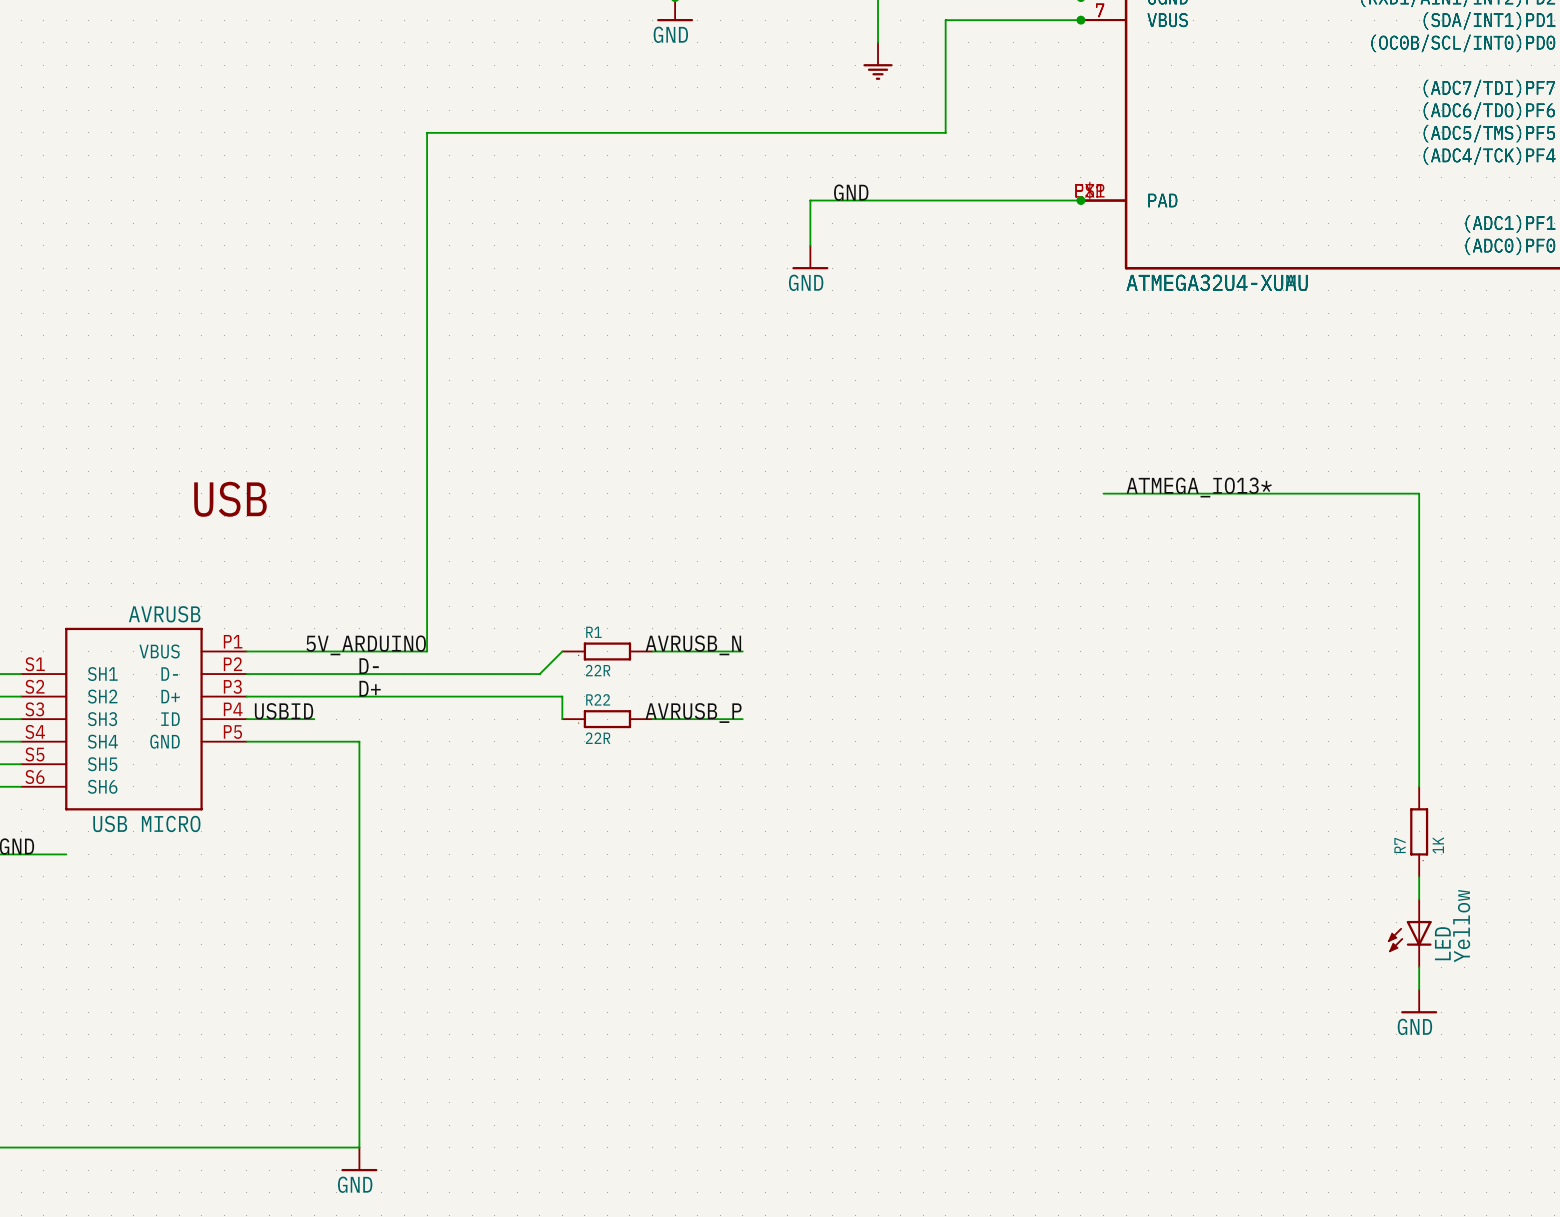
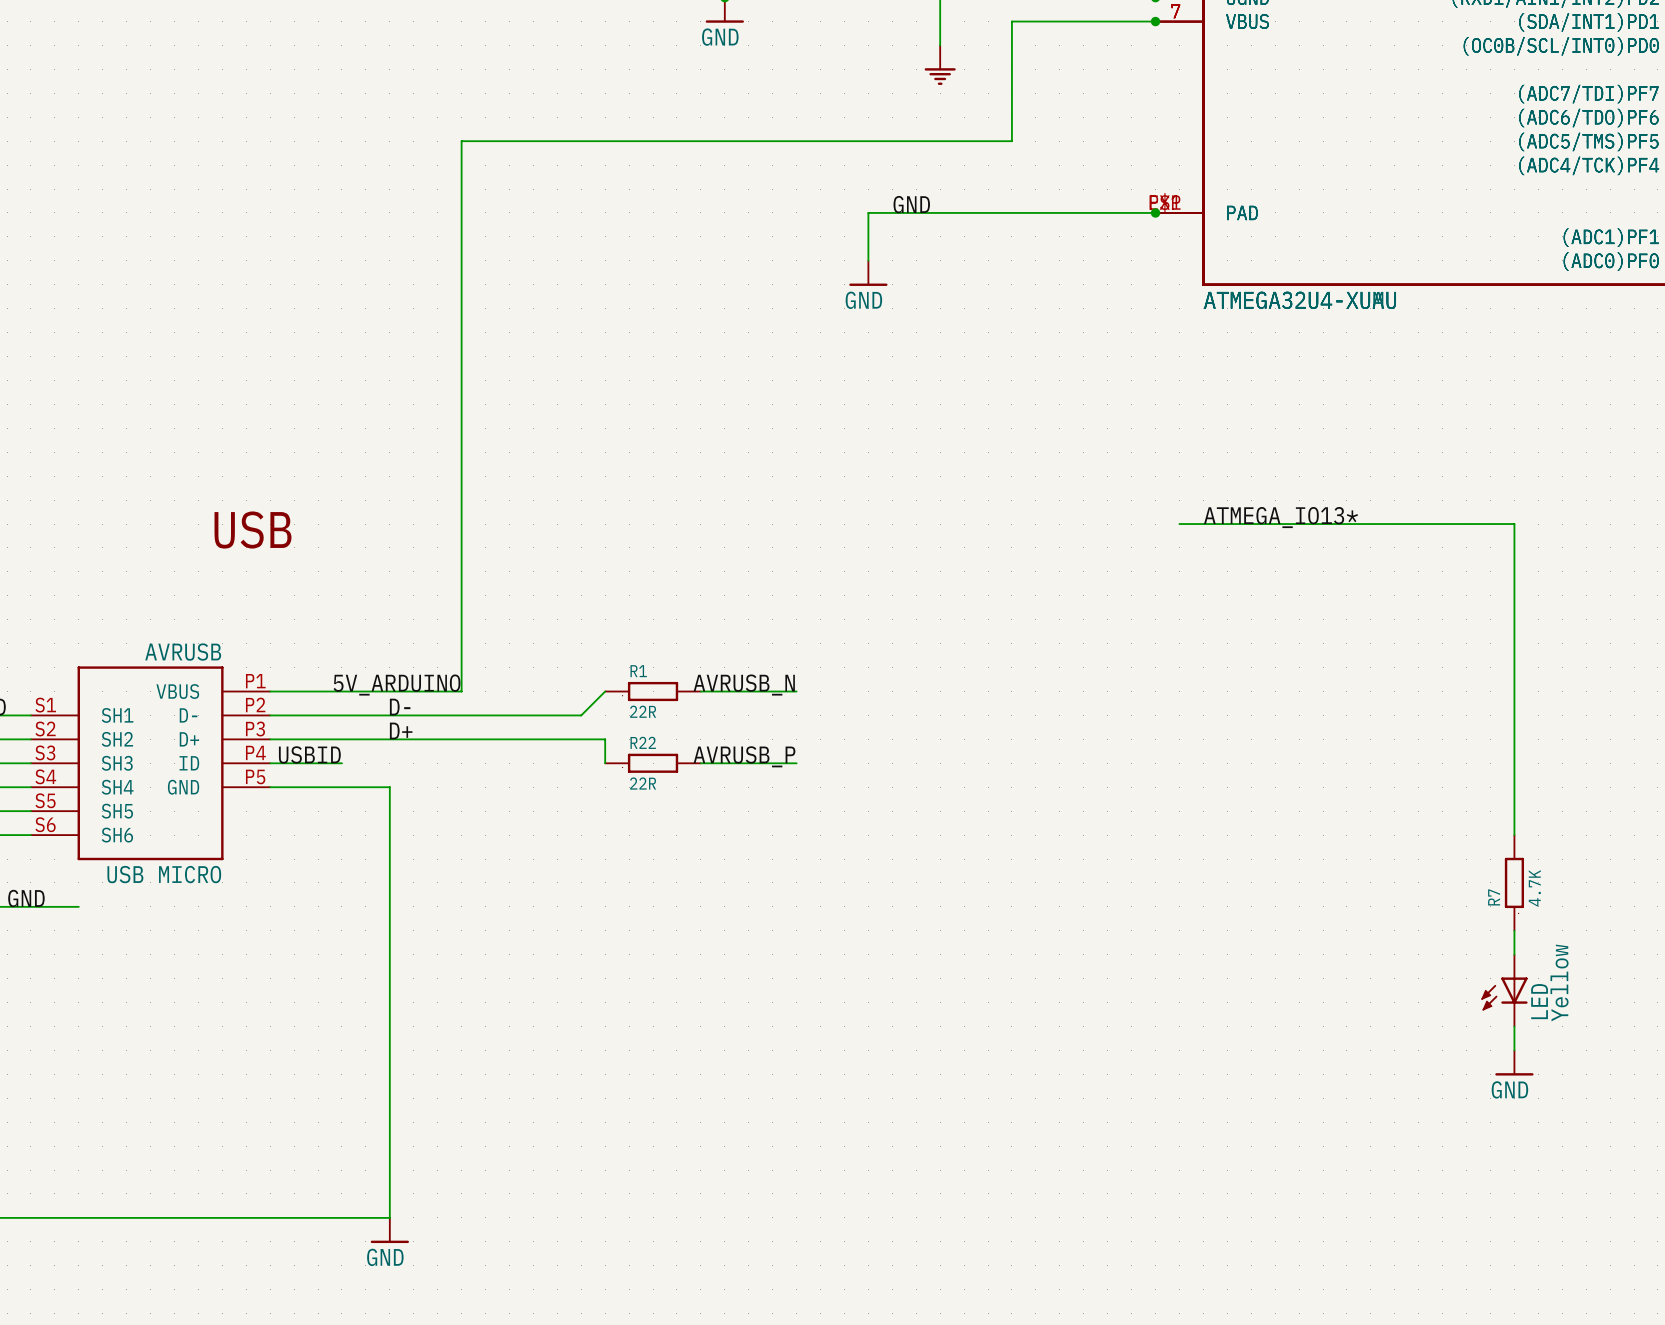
R7 value: 1K (1438, 845) -> 4.7K (1534, 888)

